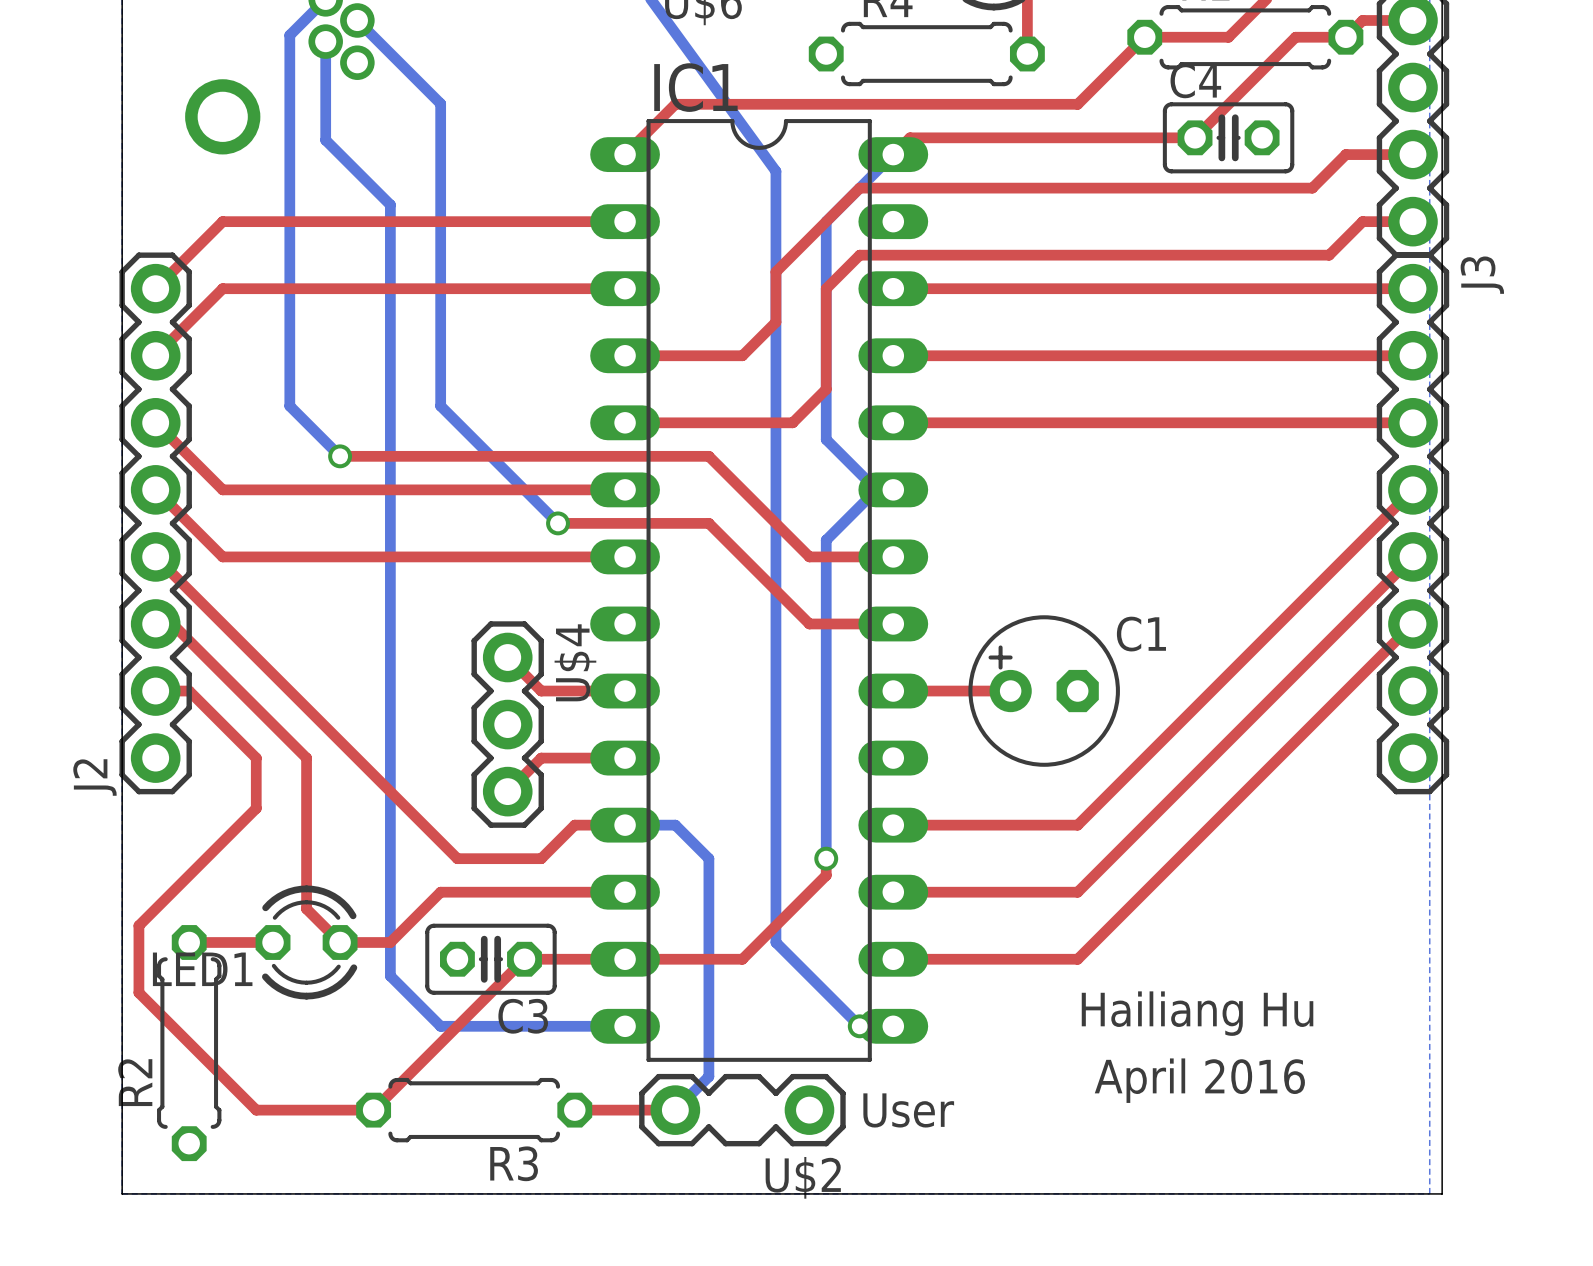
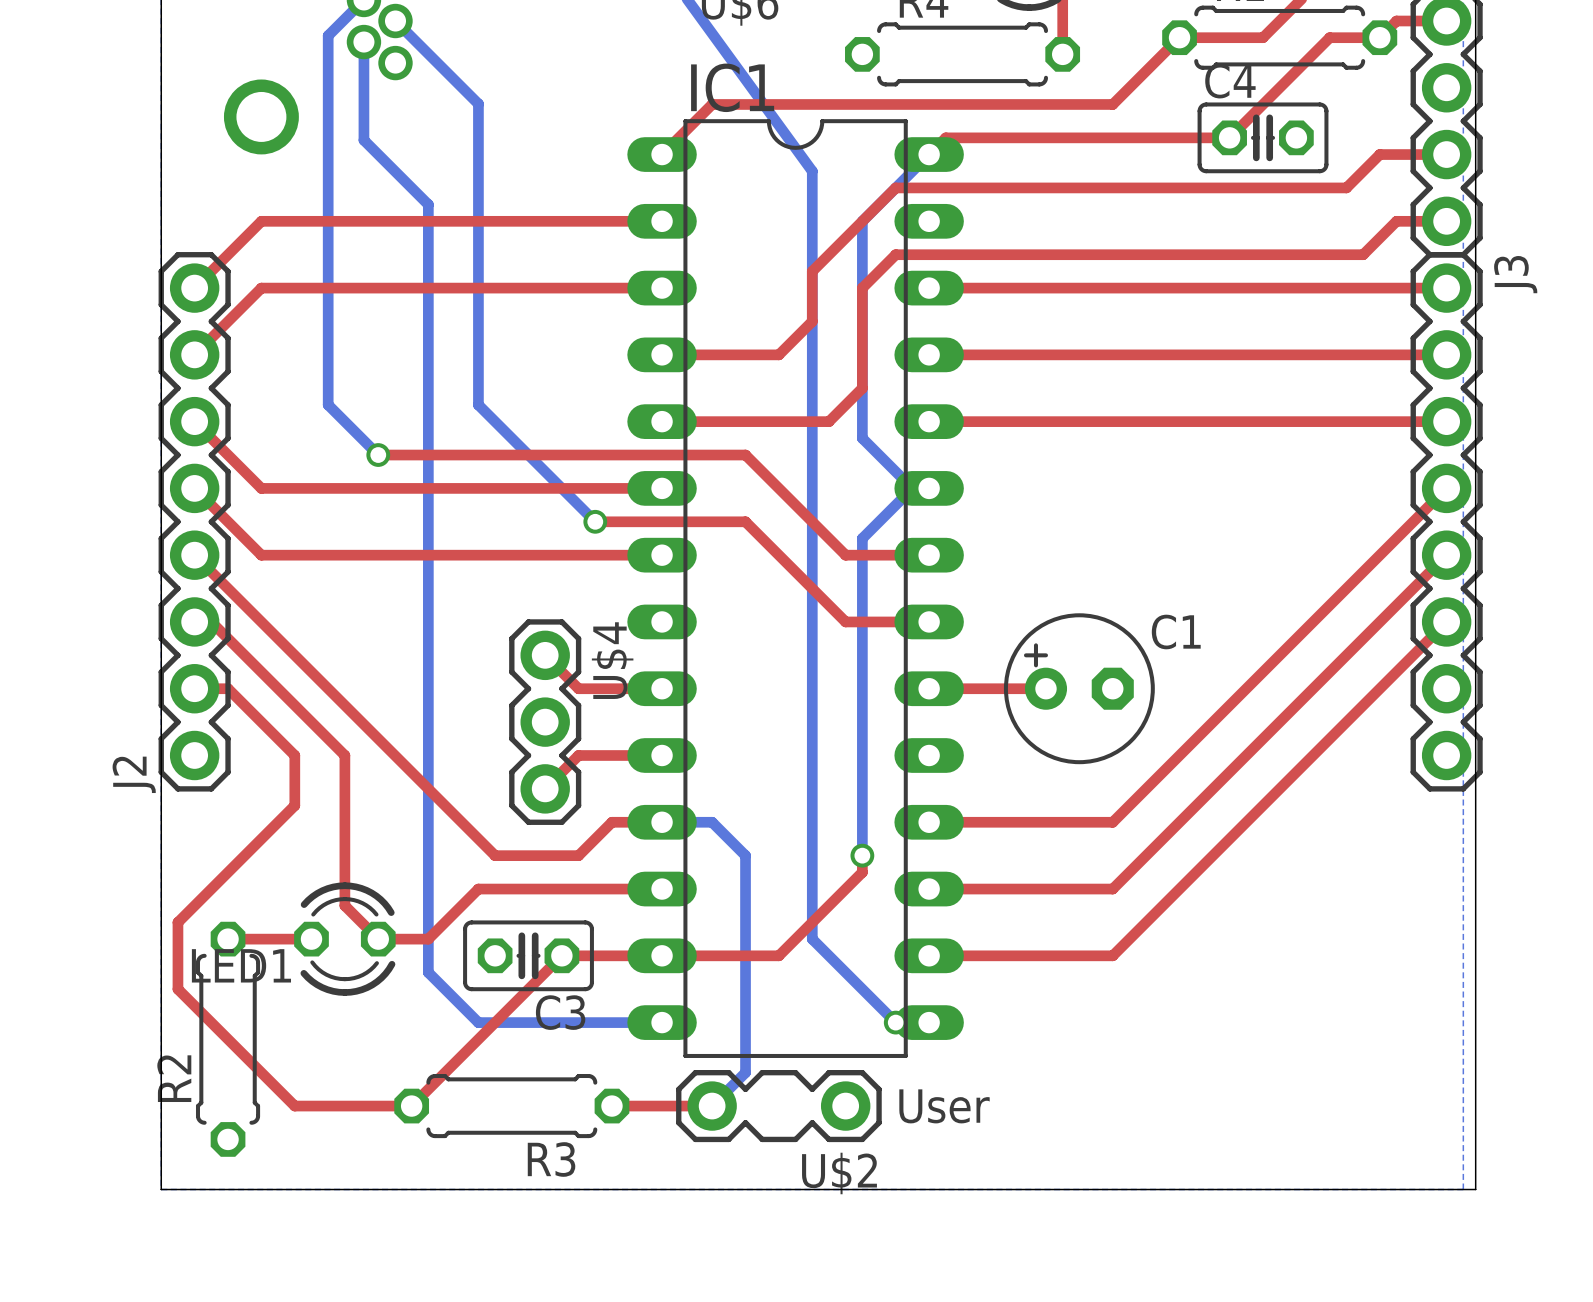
text: Hailiang Hu (1197, 1013) -> none
text: April 2016 (1199, 1080) -> none

